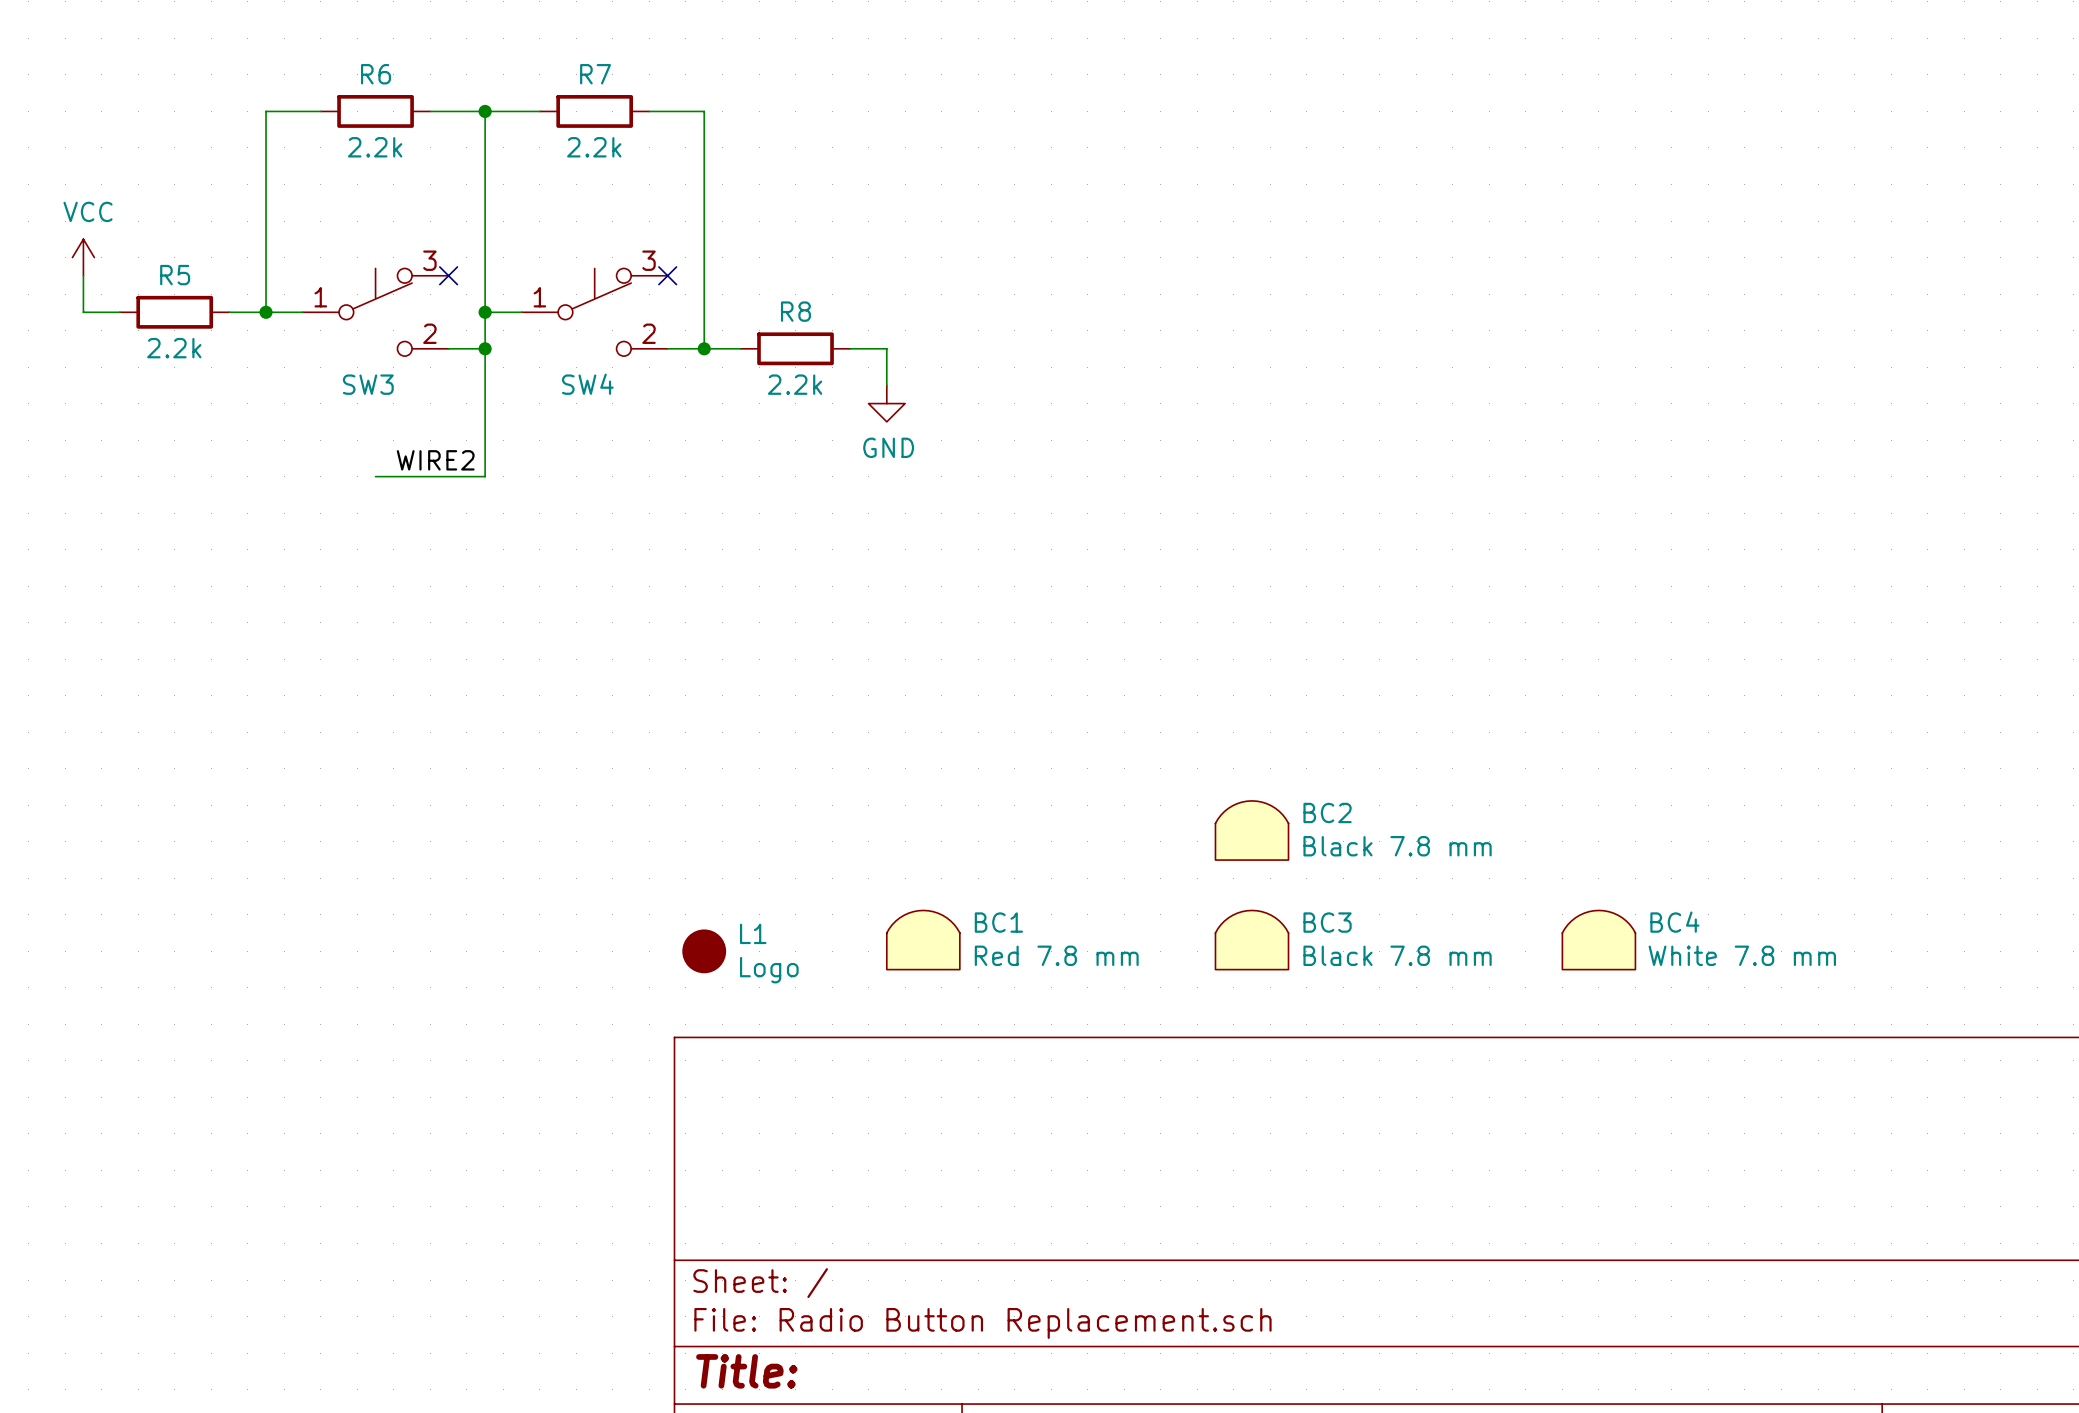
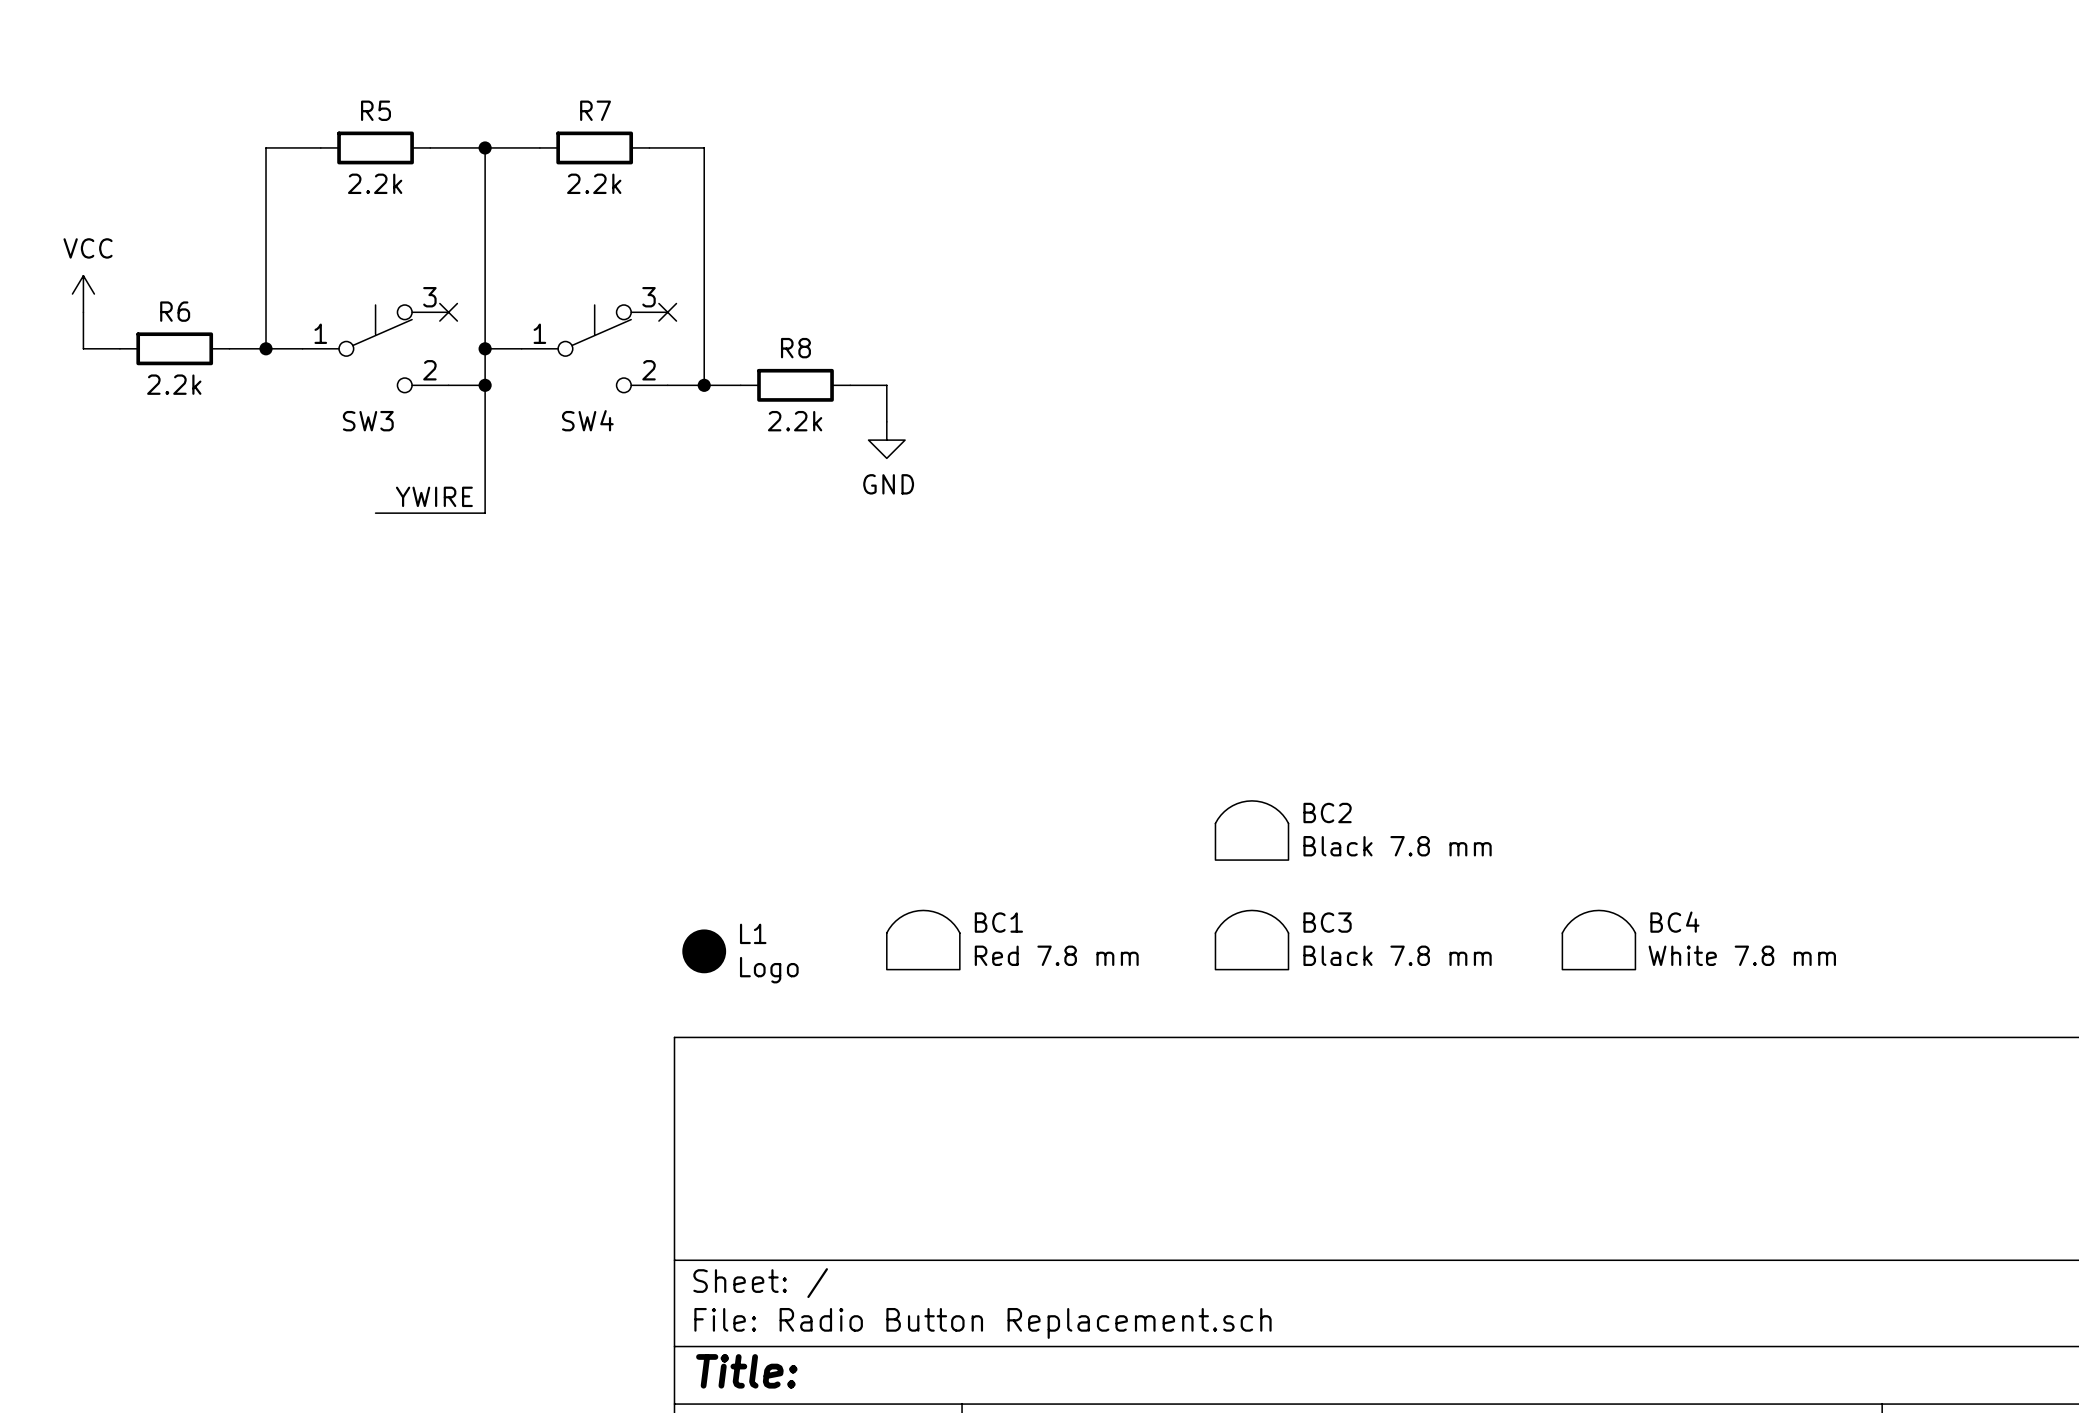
wire: (320, 111) (266, 111) (266, 147) -> (320, 147) (266, 147)
R6 position: (375, 111) -> (174, 348)
wire: (430, 111) (539, 111) -> (430, 147) (539, 147)
wire: (485, 111) (485, 147) -> (266, 312) (266, 348)
junction position: (485, 111) -> (485, 147)
R7 position: (594, 111) -> (594, 147)
wire: (649, 111) (704, 111) (704, 147) -> (649, 147) (704, 147)
power symbol position: VCC (83, 257) -> VCC (83, 294)
wire: (83, 275) (83, 312) (119, 312) -> (83, 312) (83, 348) (119, 348)
no-connect mark position: (448, 275) -> (448, 312)
no-connect mark position: (667, 275) -> (667, 312)
R5 position: (174, 312) -> (375, 147)
wire: (229, 312) (302, 312) -> (229, 348) (302, 348)
junction position: (266, 312) -> (266, 348)
SW3 position: (375, 312) -> (375, 348)
wire: (485, 312) (521, 312) -> (448, 385) (485, 385)
junction position: (485, 312) -> (485, 385)
SW4 position: (594, 312) -> (594, 348)
wire: (448, 348) (485, 348) -> (521, 348) (485, 348)
wire: (667, 348) (740, 348) -> (667, 385) (740, 385)
wire: none -> (704, 348) (704, 385)
junction position: (704, 348) -> (704, 385)
R8 position: (795, 348) -> (795, 385)
wire: (850, 348) (886, 348) (886, 385) -> (850, 385) (886, 385) (886, 421)
power symbol position: GND (886, 403) -> GND (886, 440)
label: WIRE2 (435, 460) -> YWIRE (434, 496)
wire: (375, 476) (485, 476) -> (375, 513) (485, 513) (485, 476)

